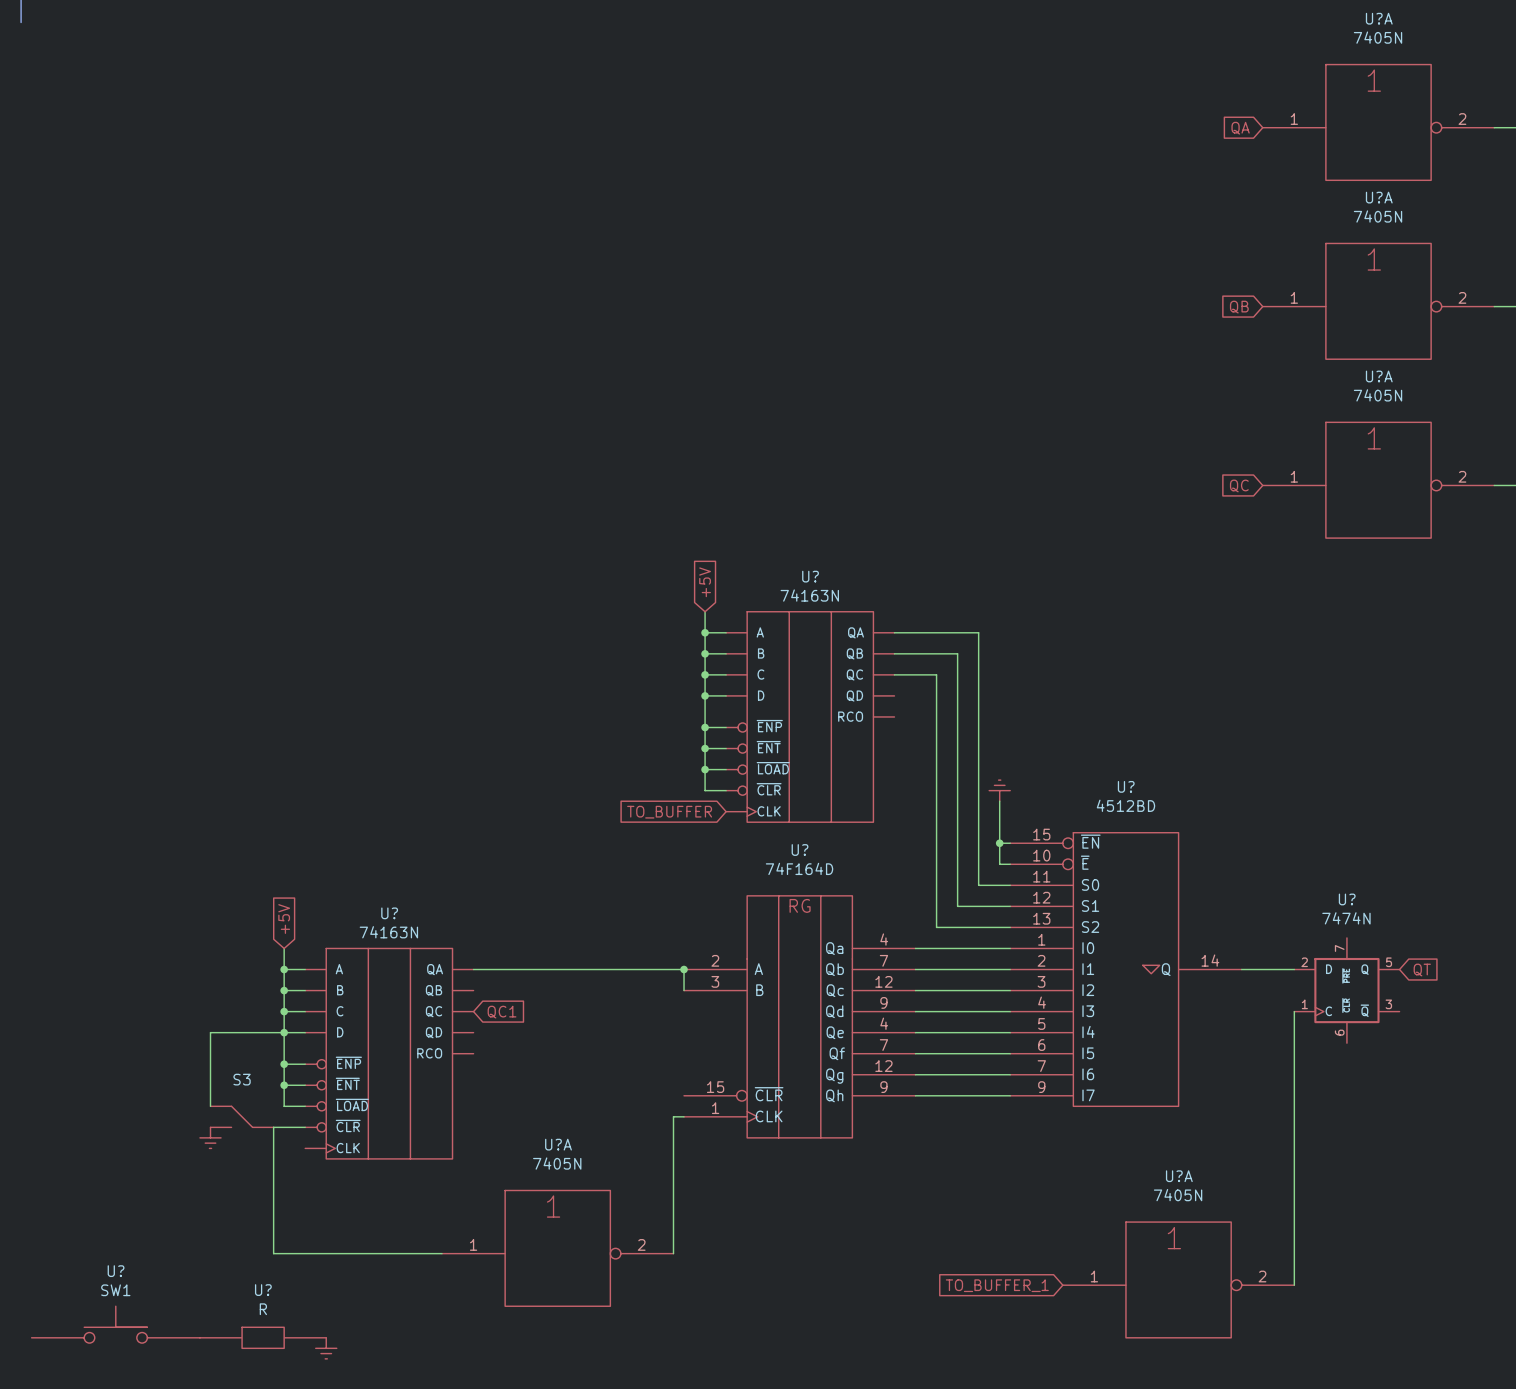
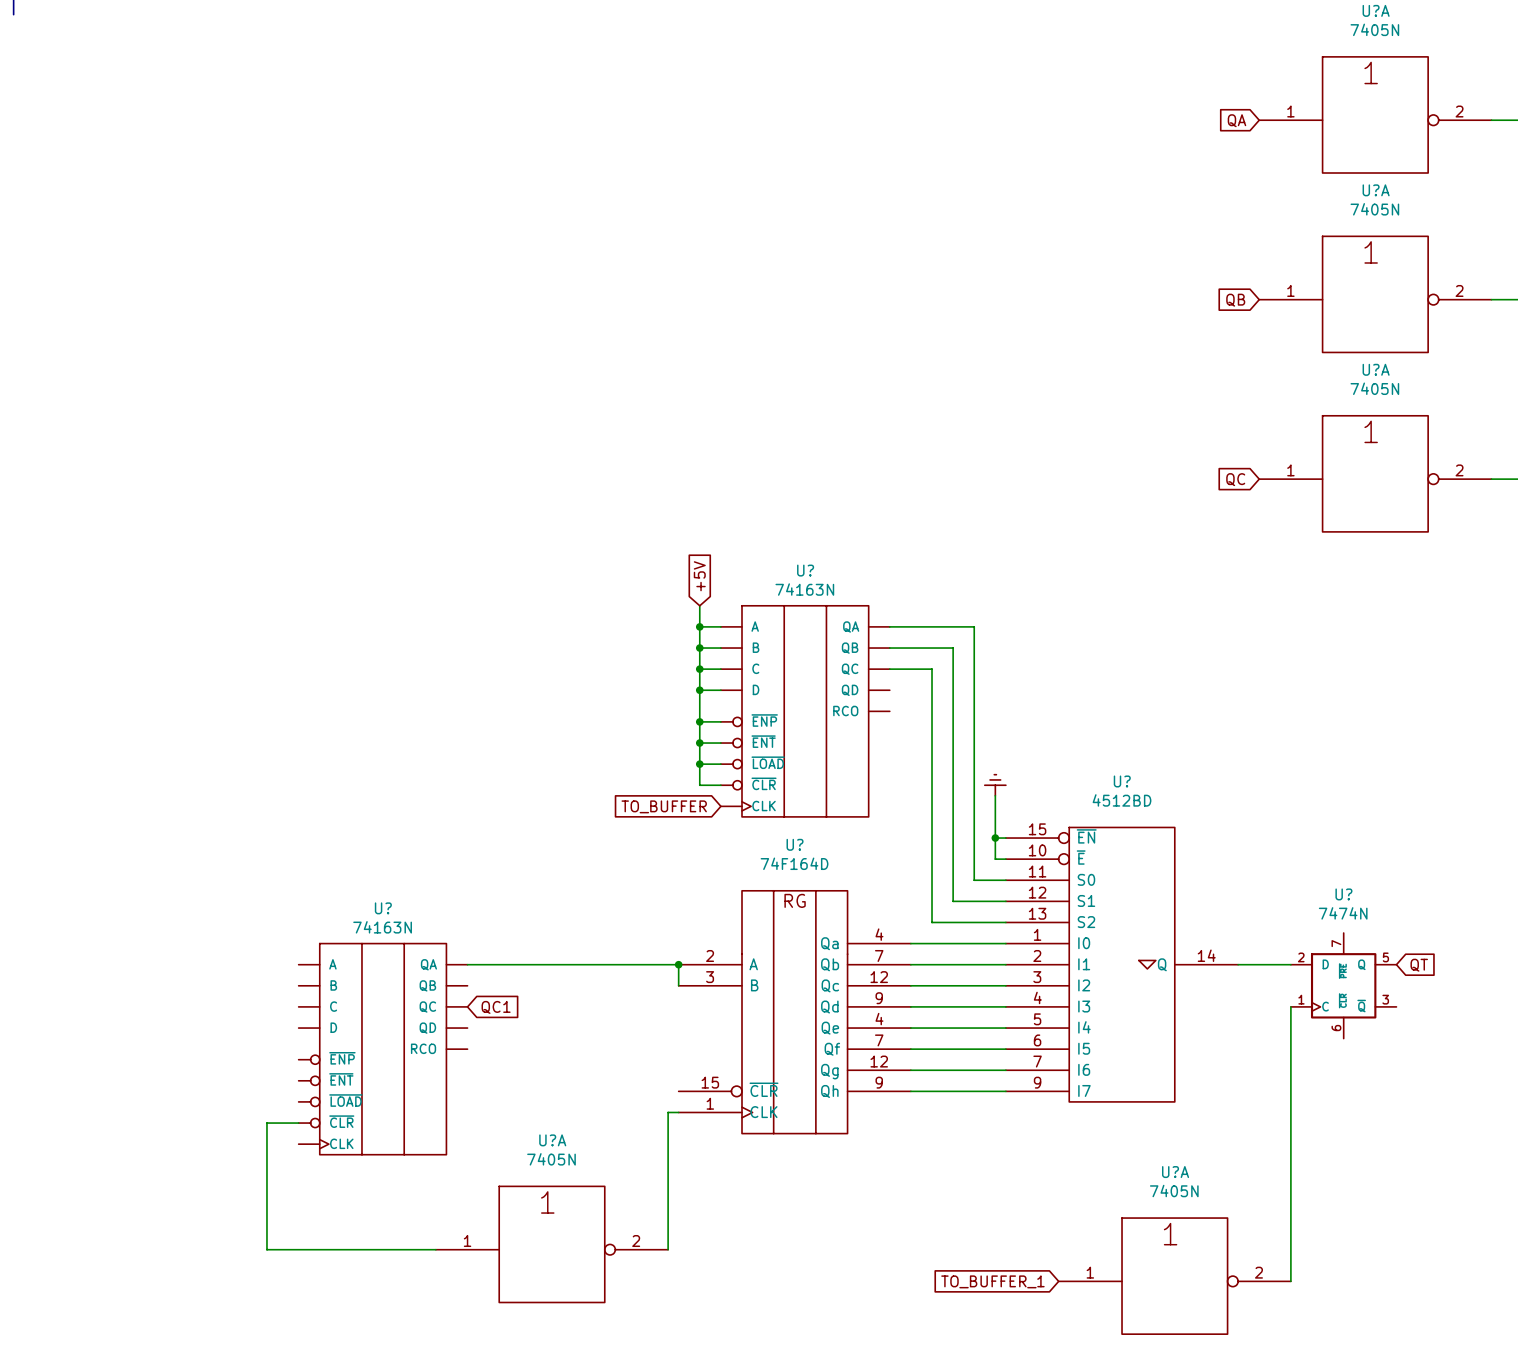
global label: +5V (284, 919) -> none
wire: (284, 948) (284, 1106) (305, 1106) -> none
wire: (284, 969) (305, 969) -> none
junction: (284, 969) -> none
wire: (284, 990) (305, 990) -> none
junction: (284, 990) -> none
wire: (284, 1011) (305, 1011) -> none
junction: (284, 1011) -> none
junction: (284, 1032) -> none
wire: (305, 1032) (210, 1032) (210, 1106) -> none
wire: (284, 1064) (305, 1064) -> none
junction: (284, 1064) -> none
wire: (284, 1085) (305, 1085) -> none
junction: (284, 1085) -> none
part: S3 (242, 1116) -> none
power symbol: (210, 1137) -> none
U?: SW1 (115, 1324) -> none
U?: R (263, 1337) -> none
power symbol: (326, 1348) -> none

